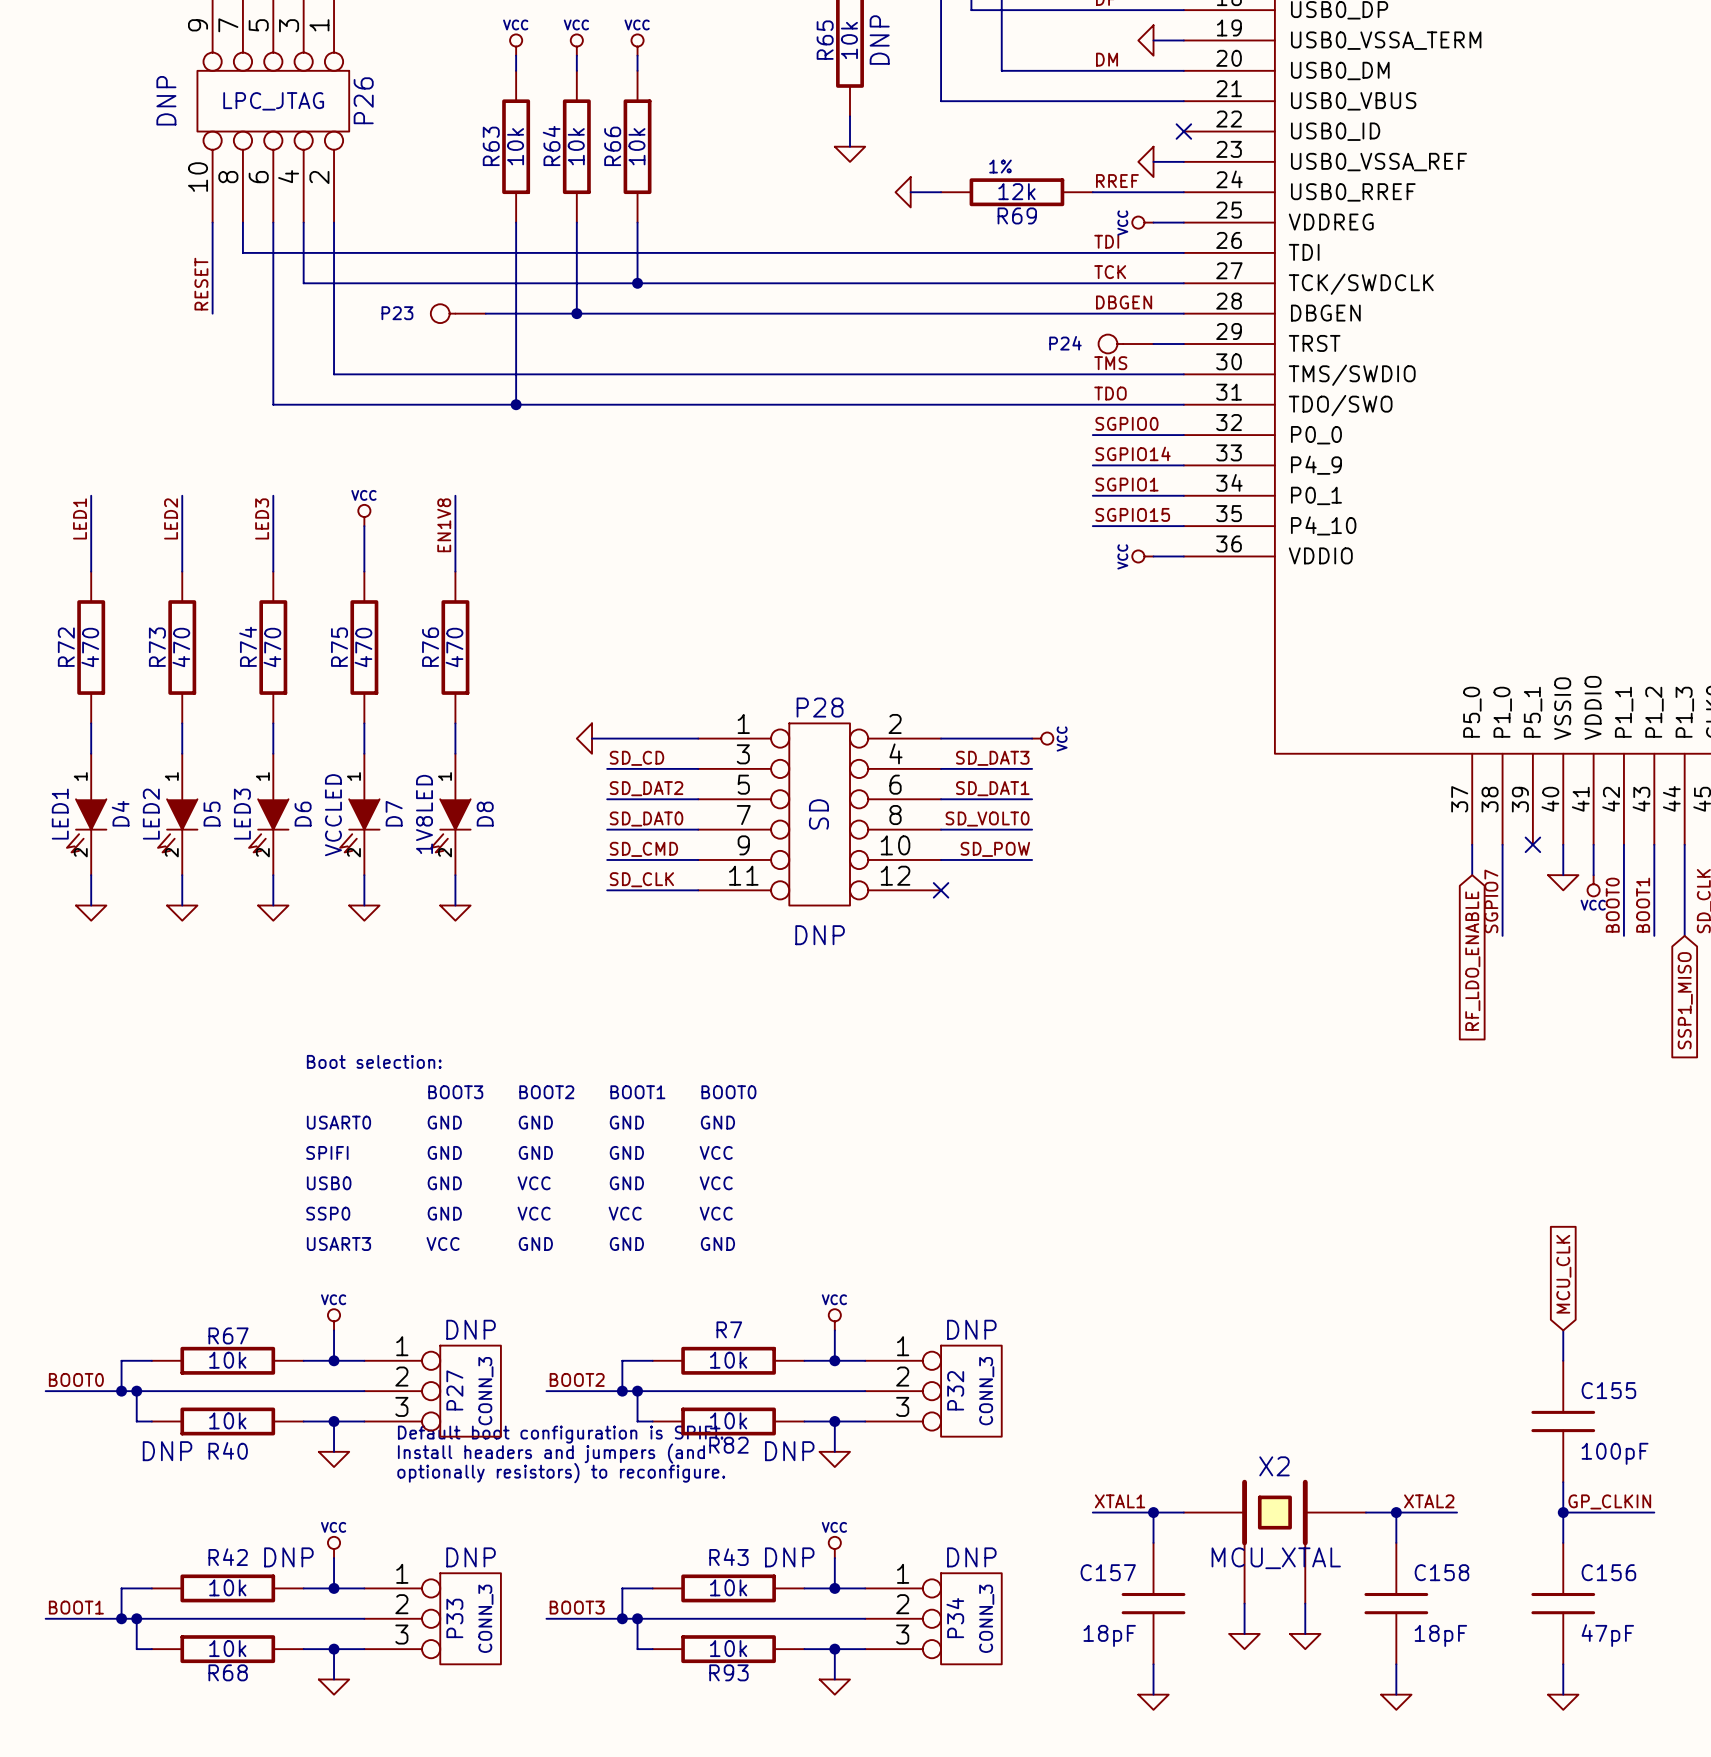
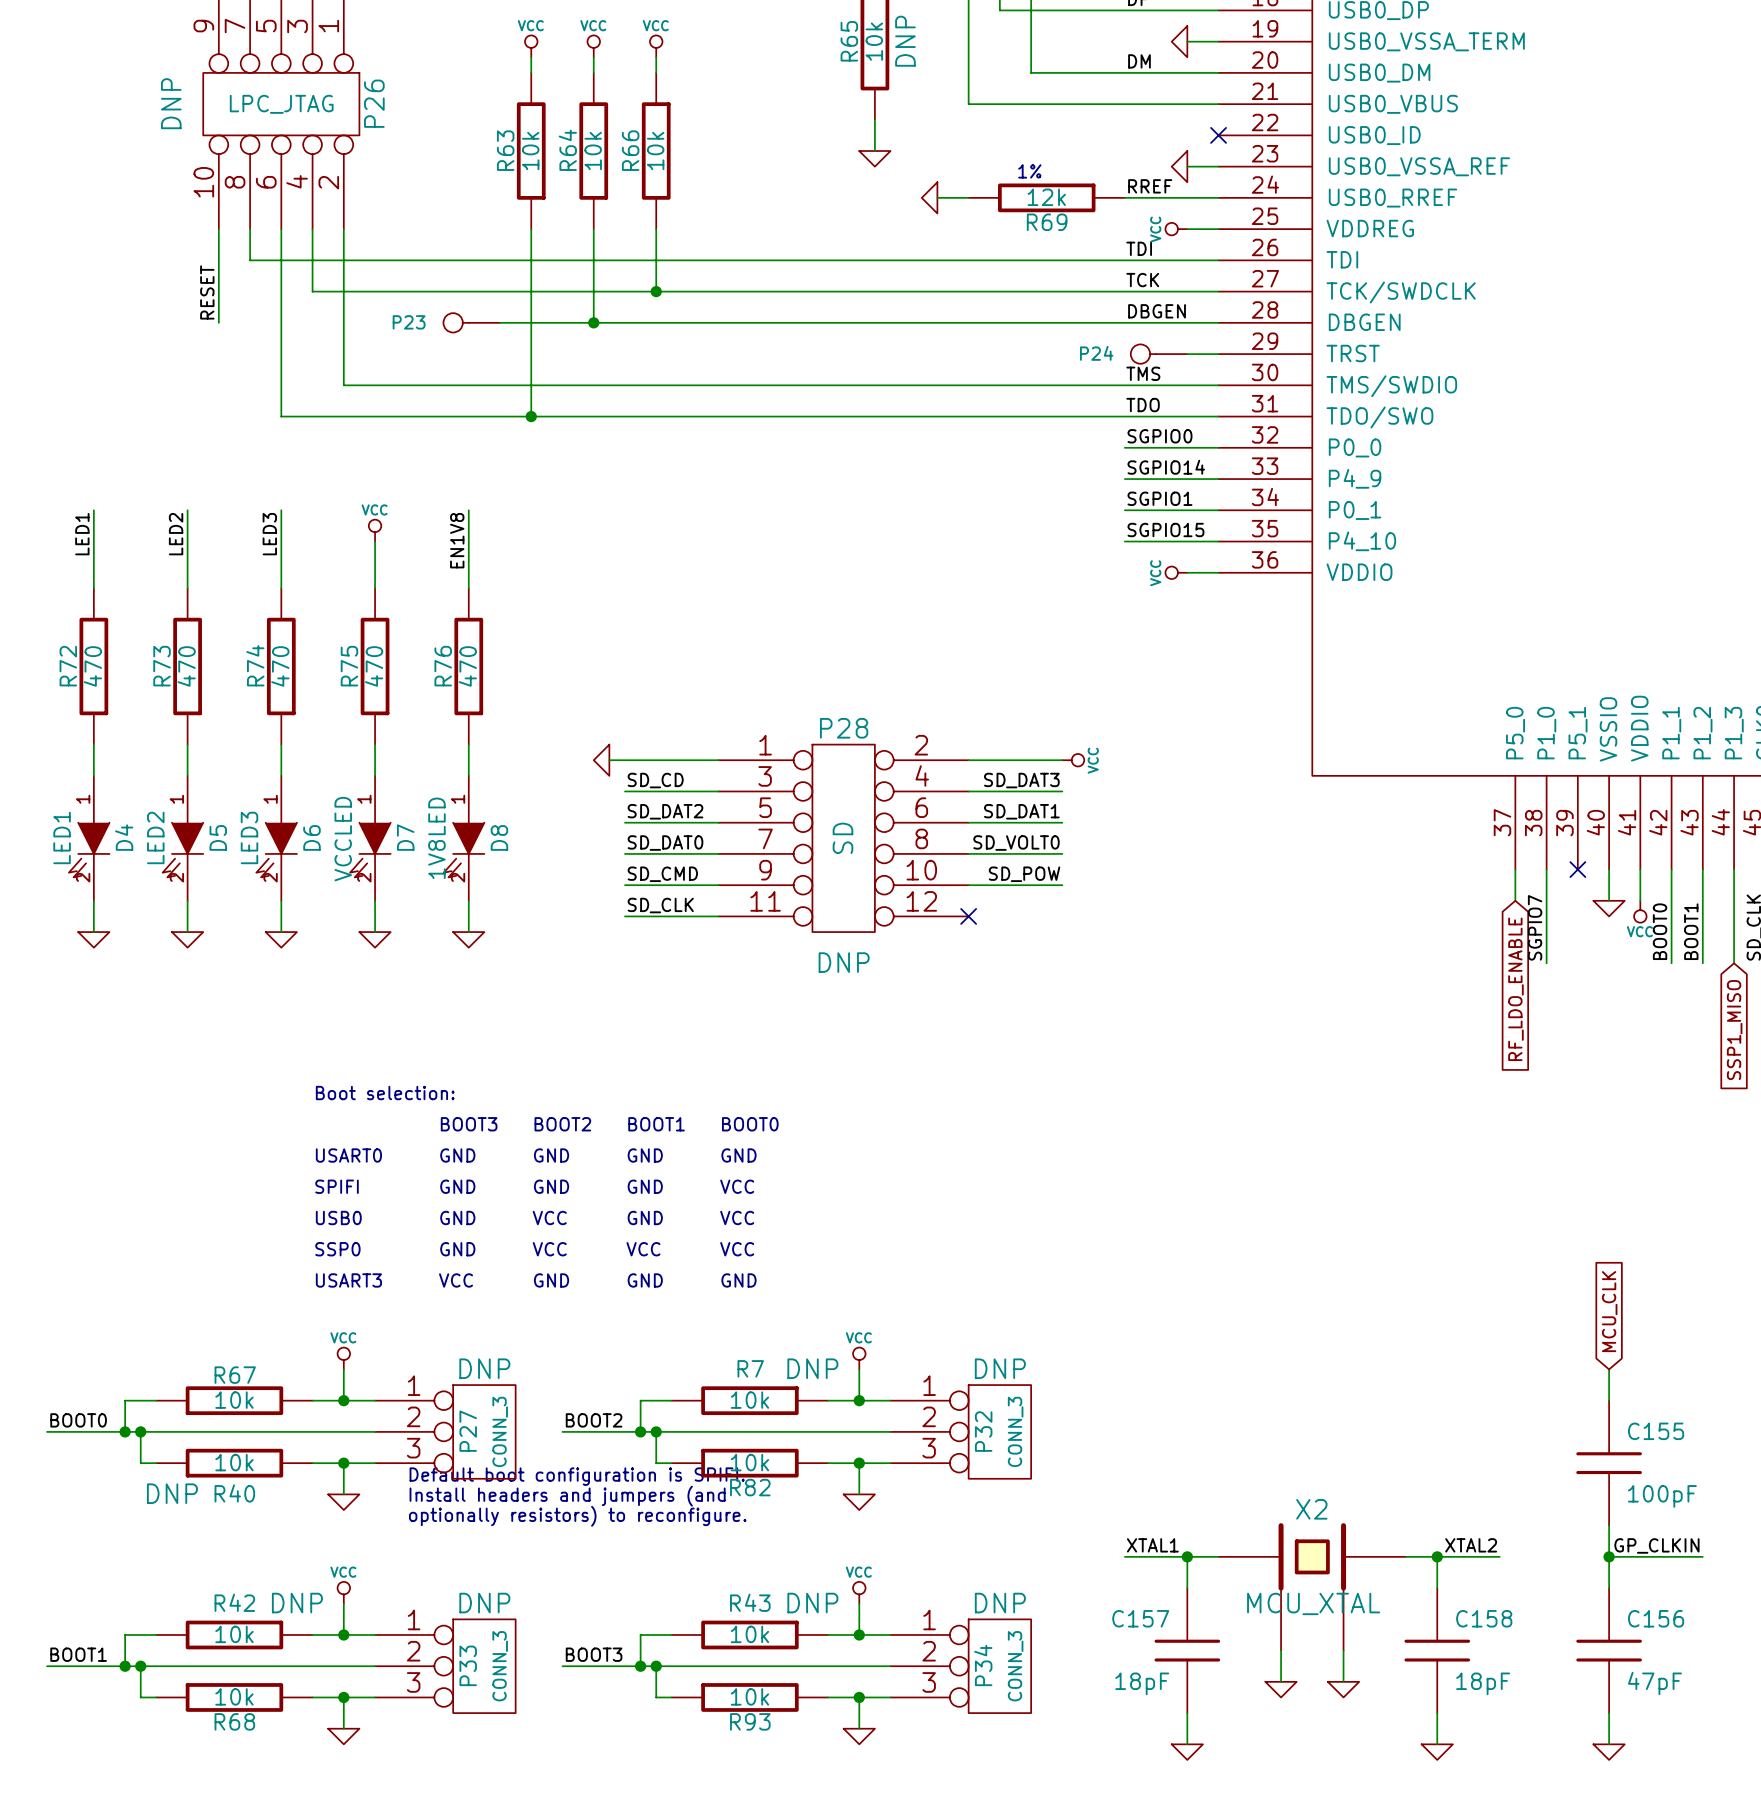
R7 text: none -> DNP (812, 1368)
R82 text: DNP (789, 1451) -> none

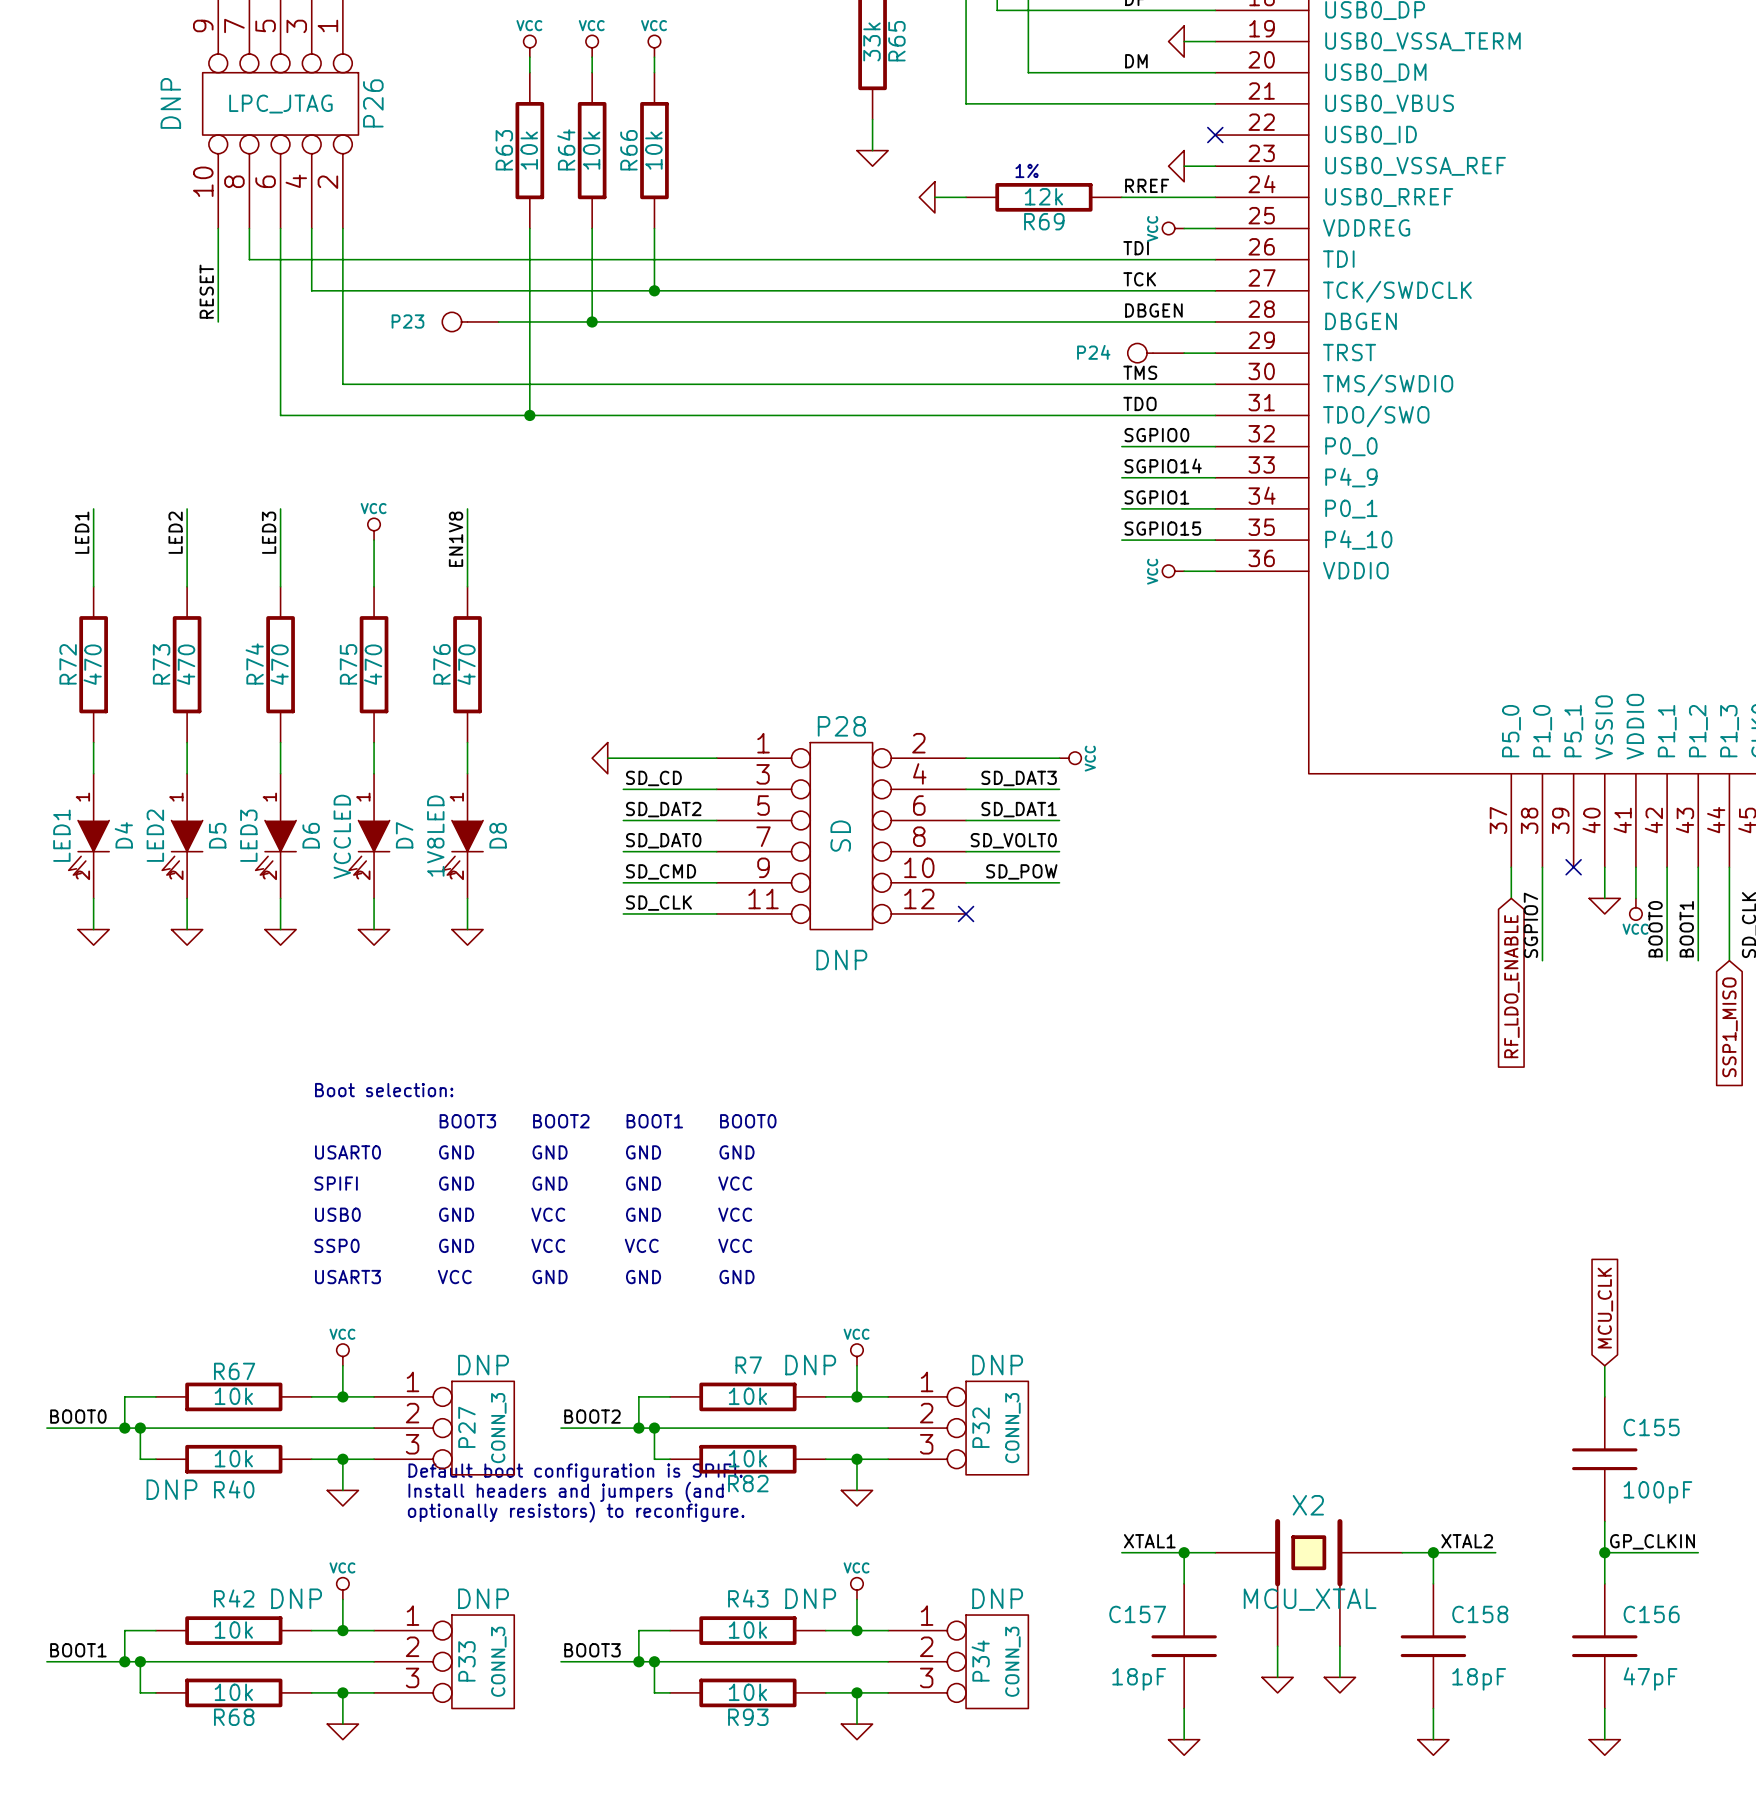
R65 name position: R65 (849, 41) -> R65 (896, 41)
R65 value: 10k (874, 41) -> 33k (871, 41)
R65 text: DNP (905, 41) -> none

